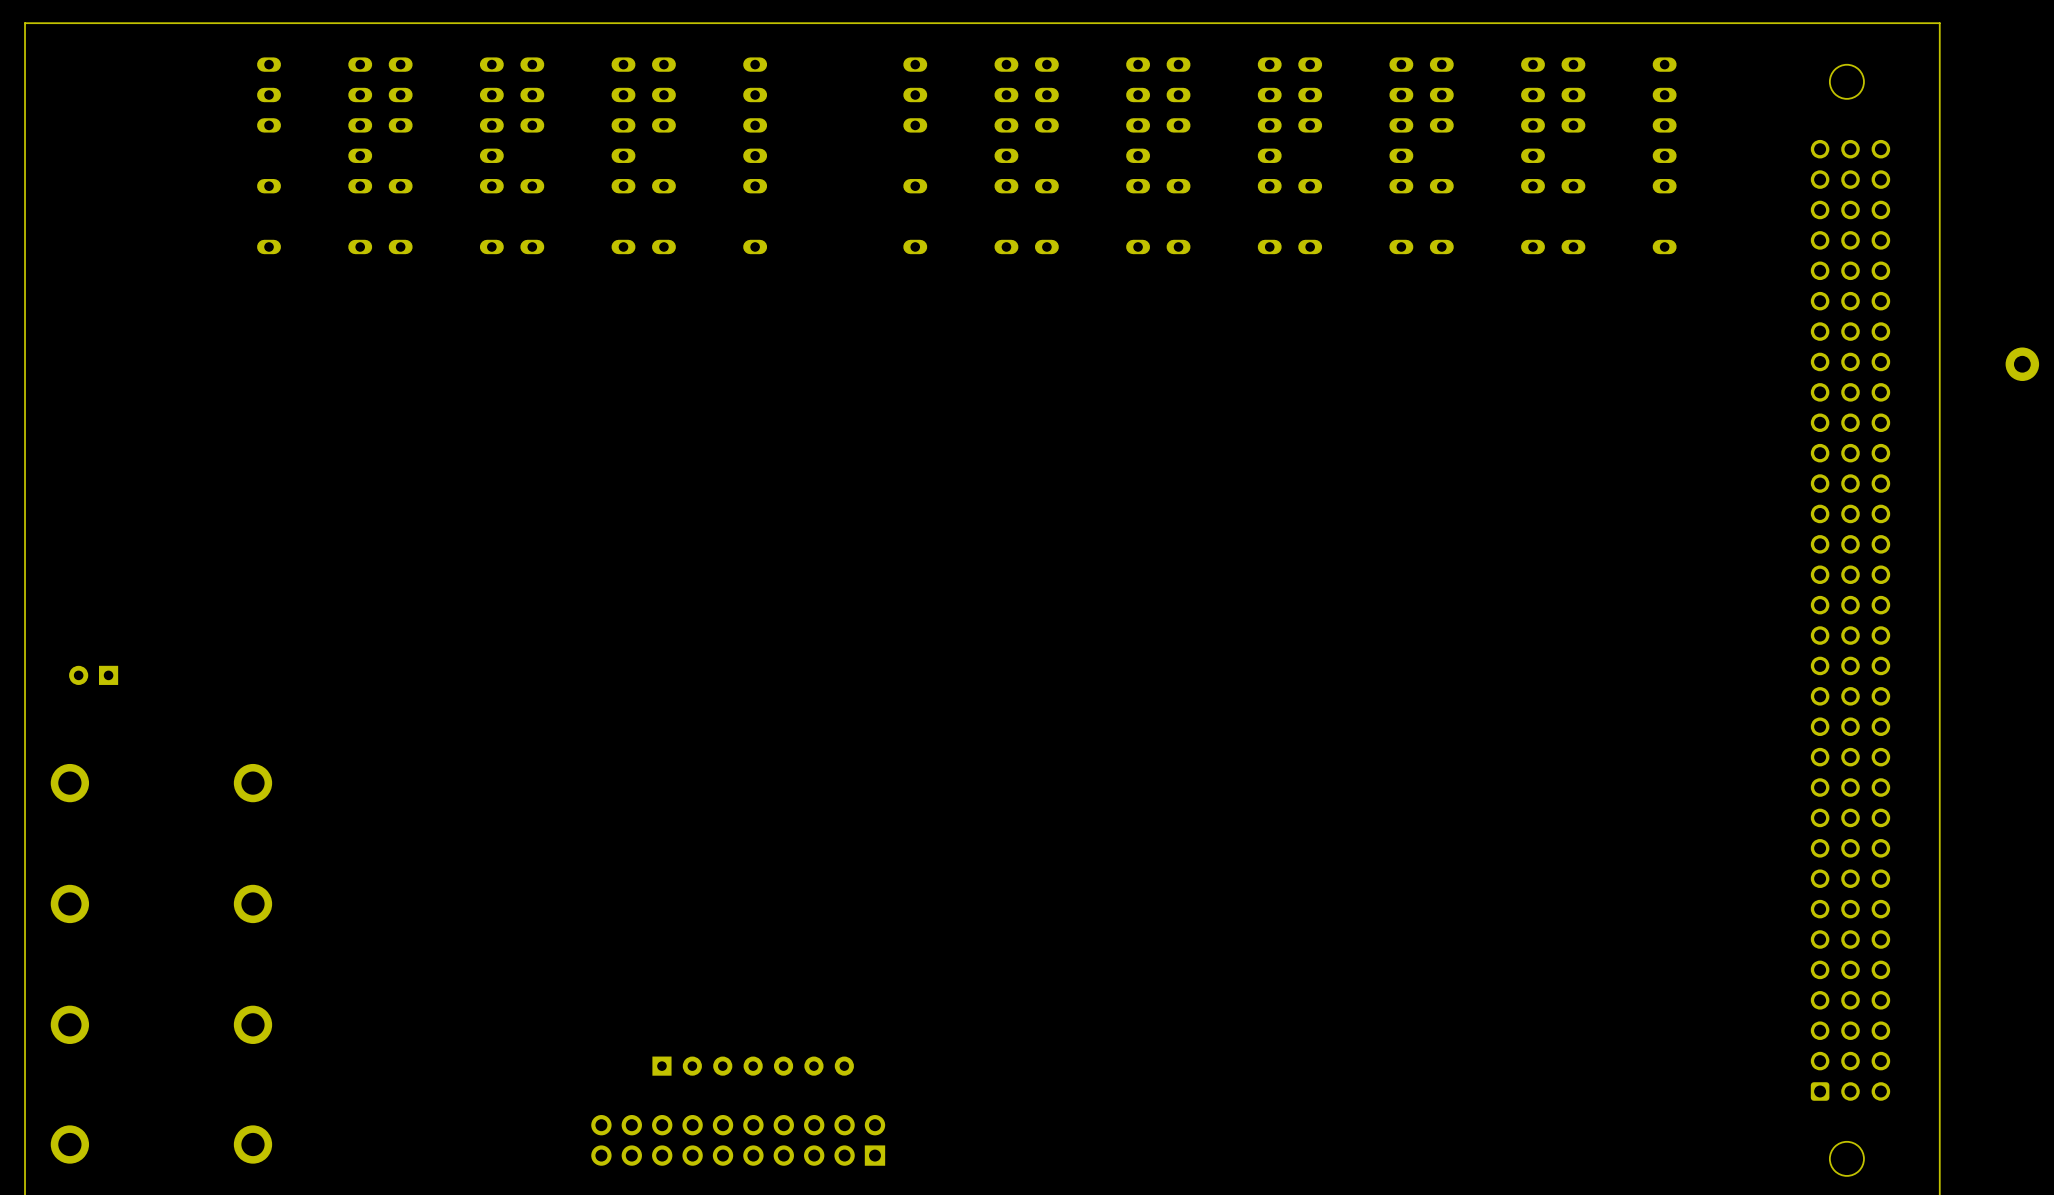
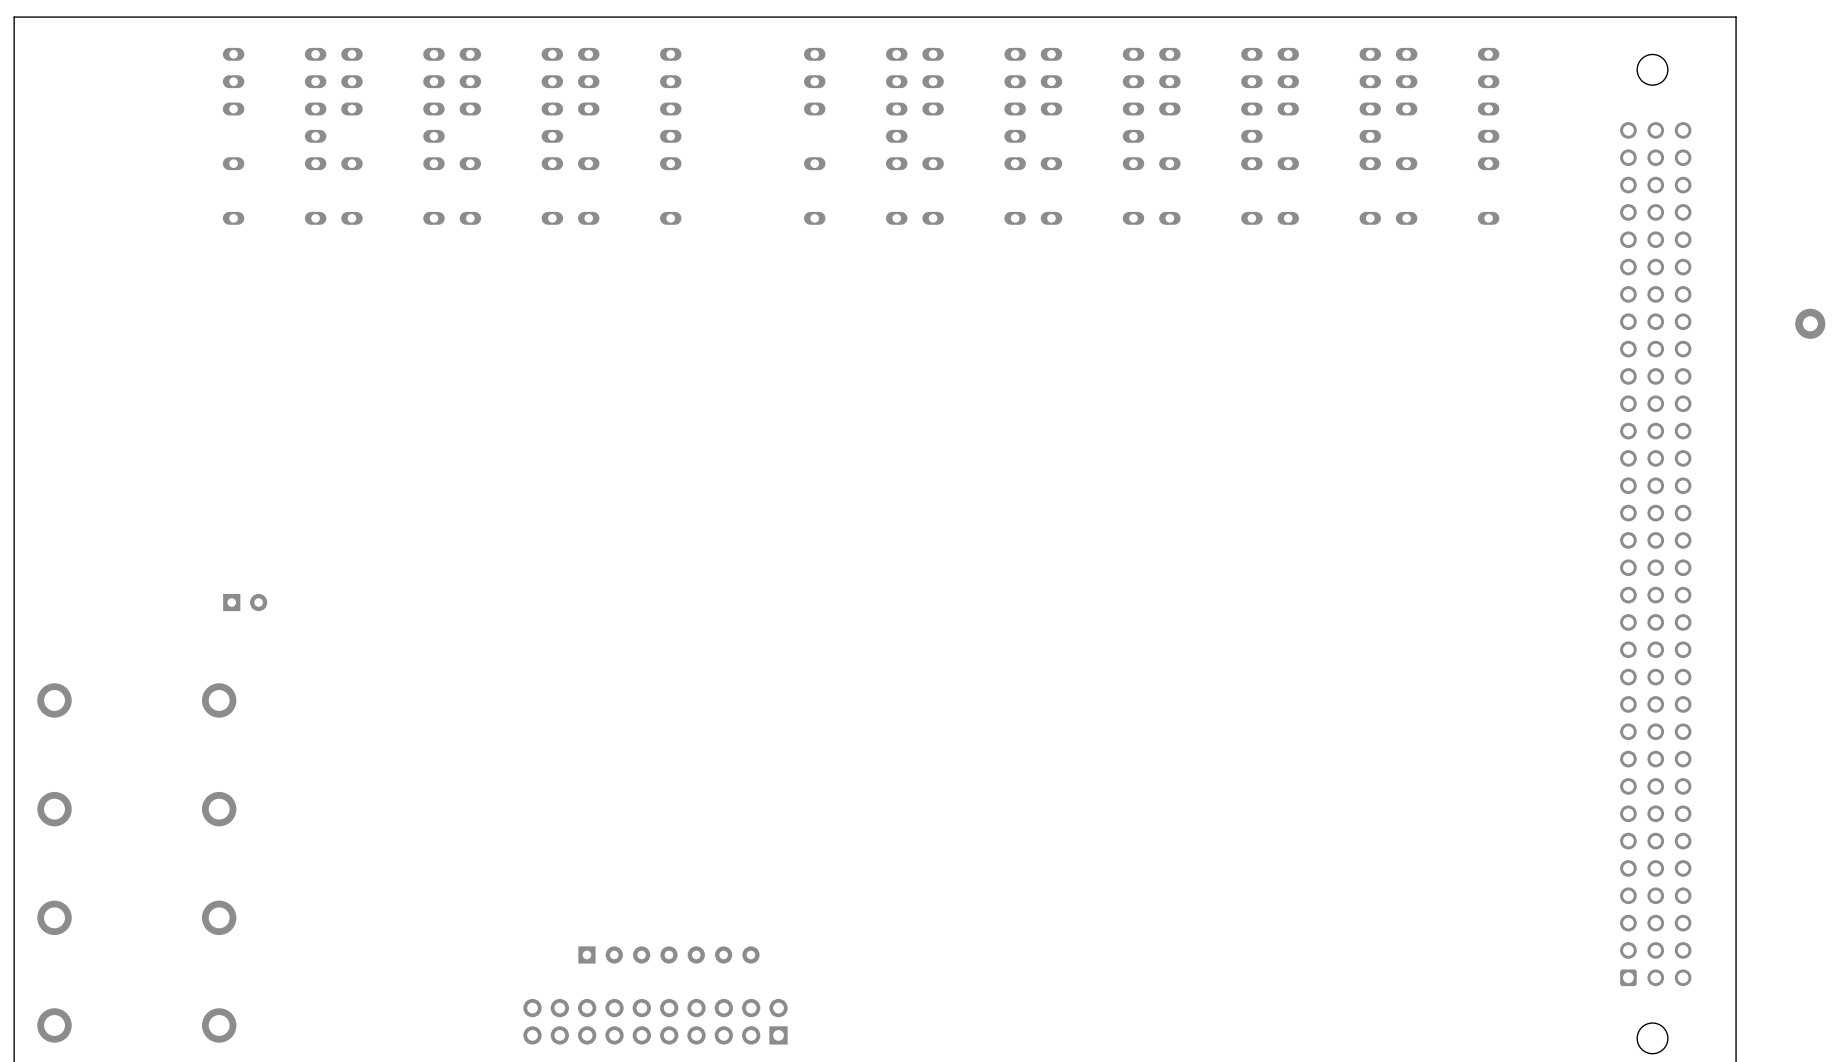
part rotation: 0° (93, 675) -> 180° (245, 602)
part position: (93, 675) -> (245, 602)

